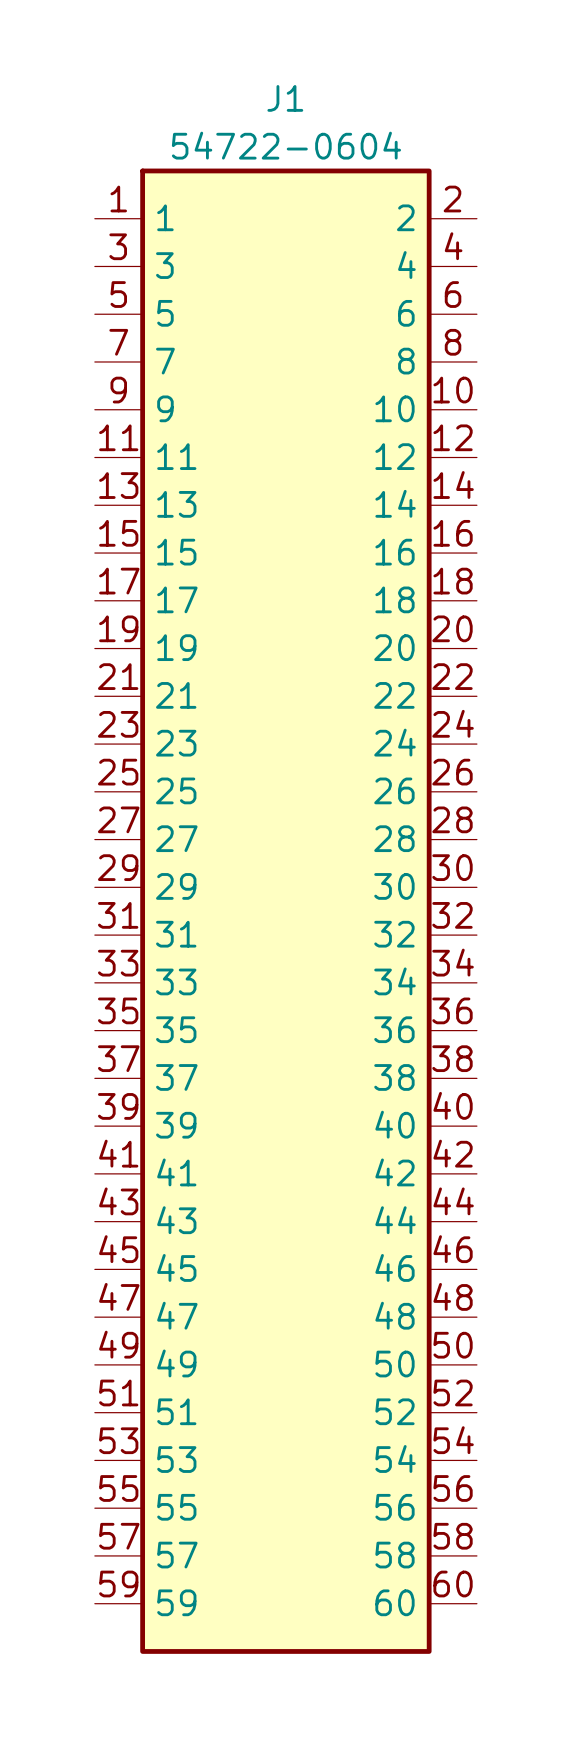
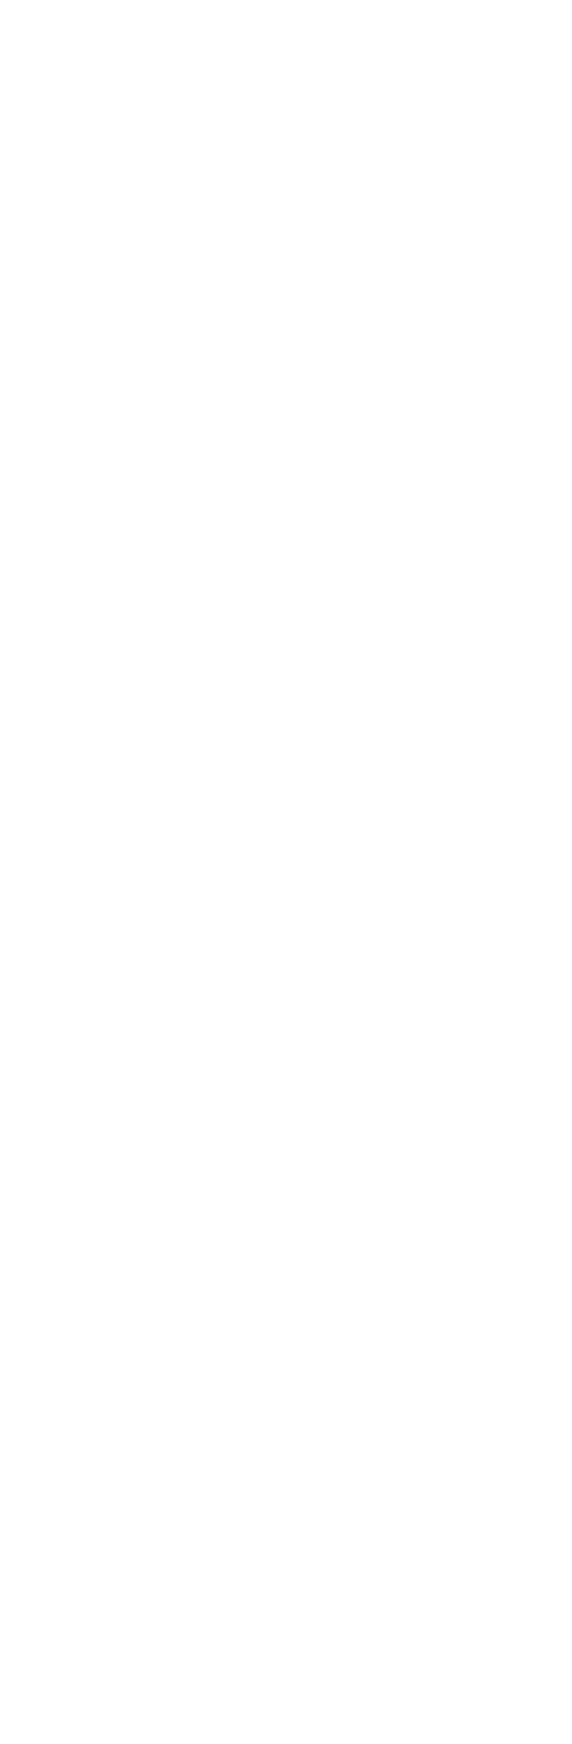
J1: 54722-0604 (285, 911) -> none

